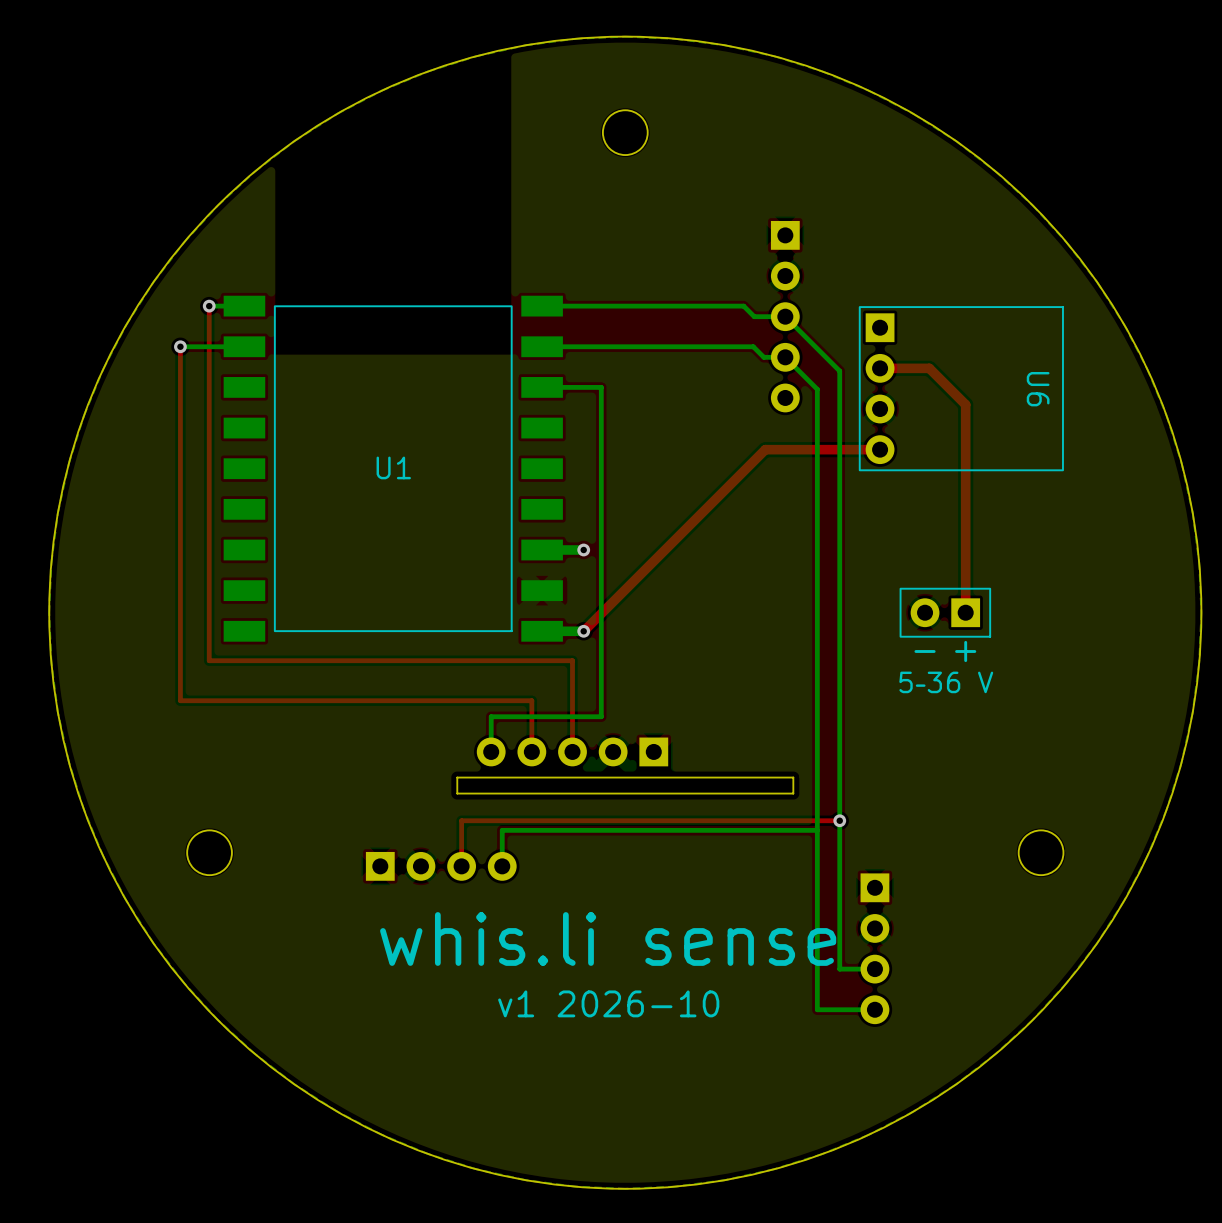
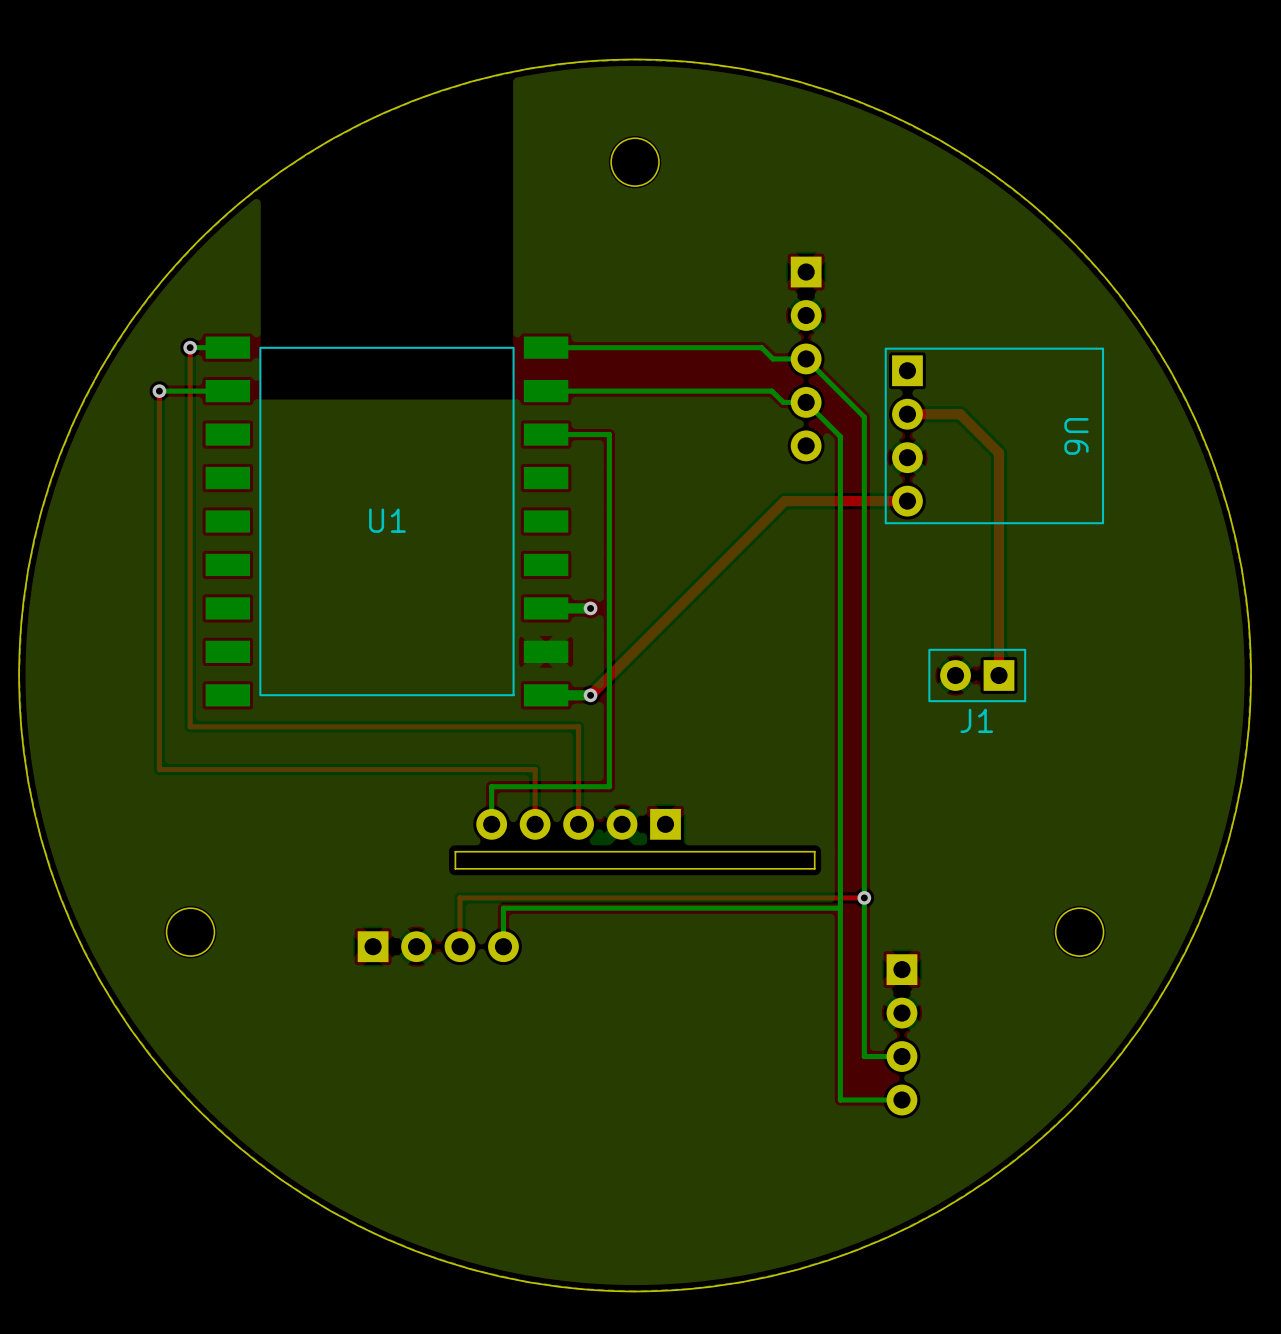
text: − (925, 651) -> none
text: + (965, 651) -> none
J1 name: none -> J1 (976, 720)
text: 5–36 V (946, 682) -> none
text: whis.li sense (608, 938) -> none
text: v1 2026-10 (608, 1003) -> none

